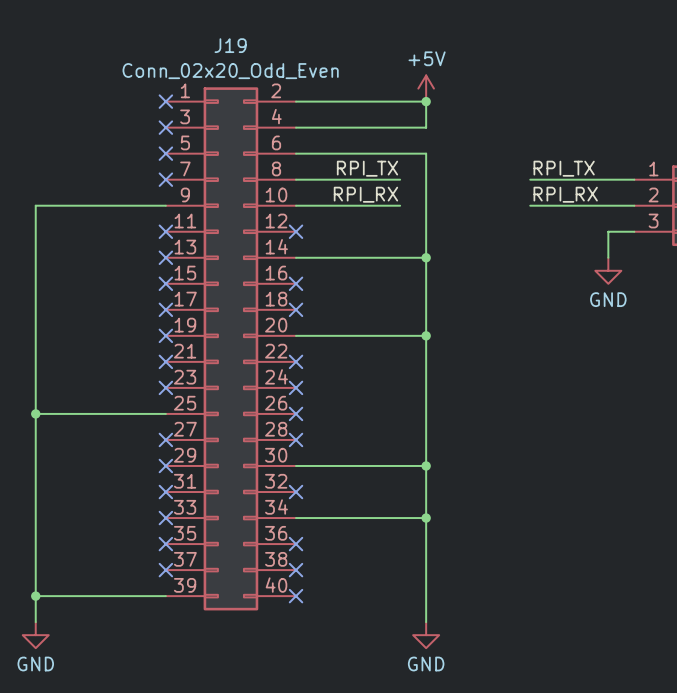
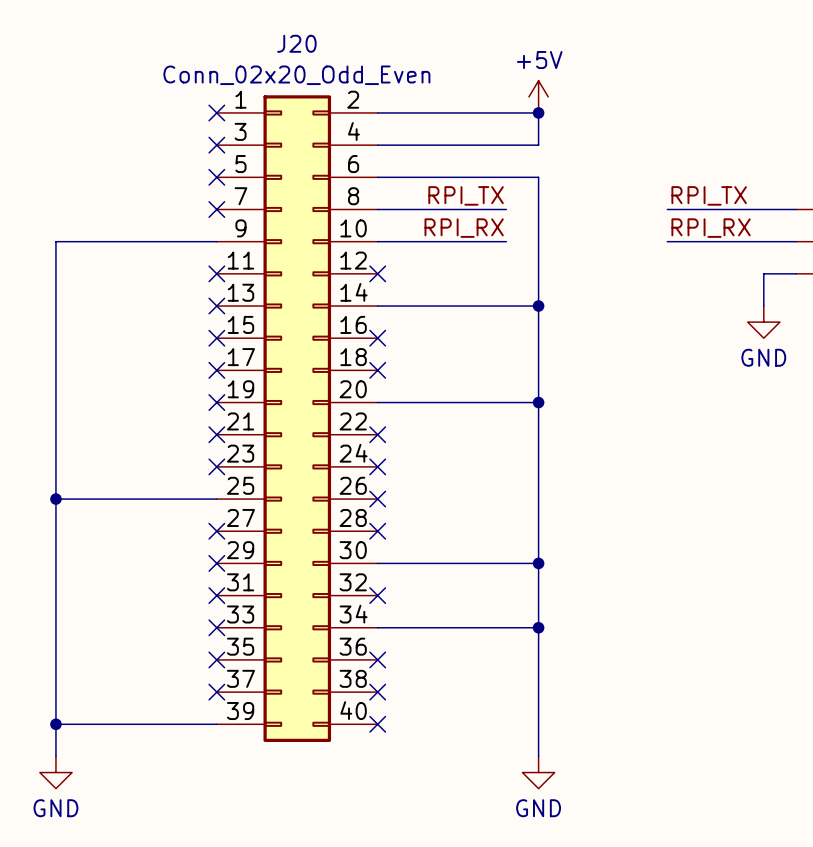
J19 name: J19 (230, 45) -> J20 (296, 43)

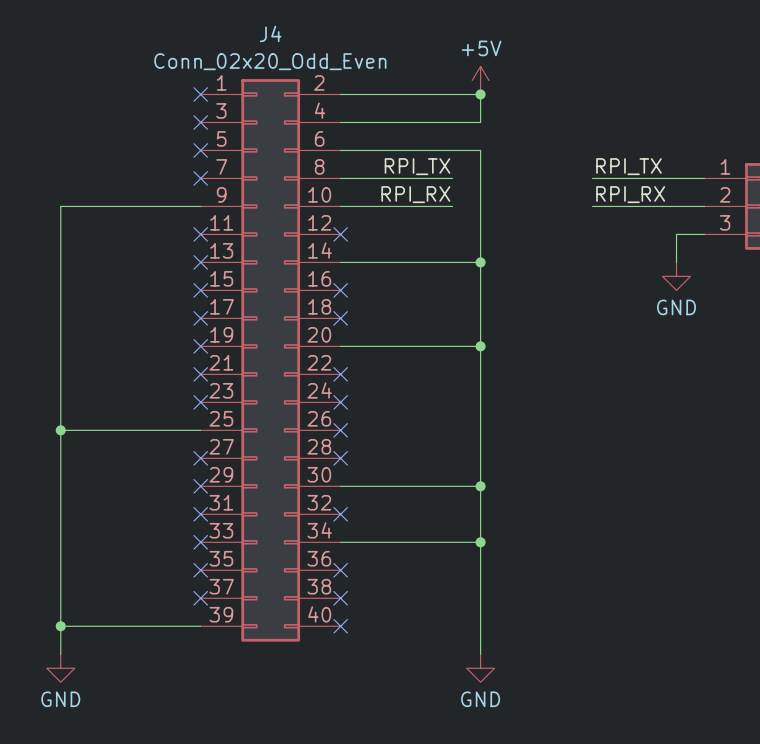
J20 name: J20 (296, 43) -> J4 (270, 33)

